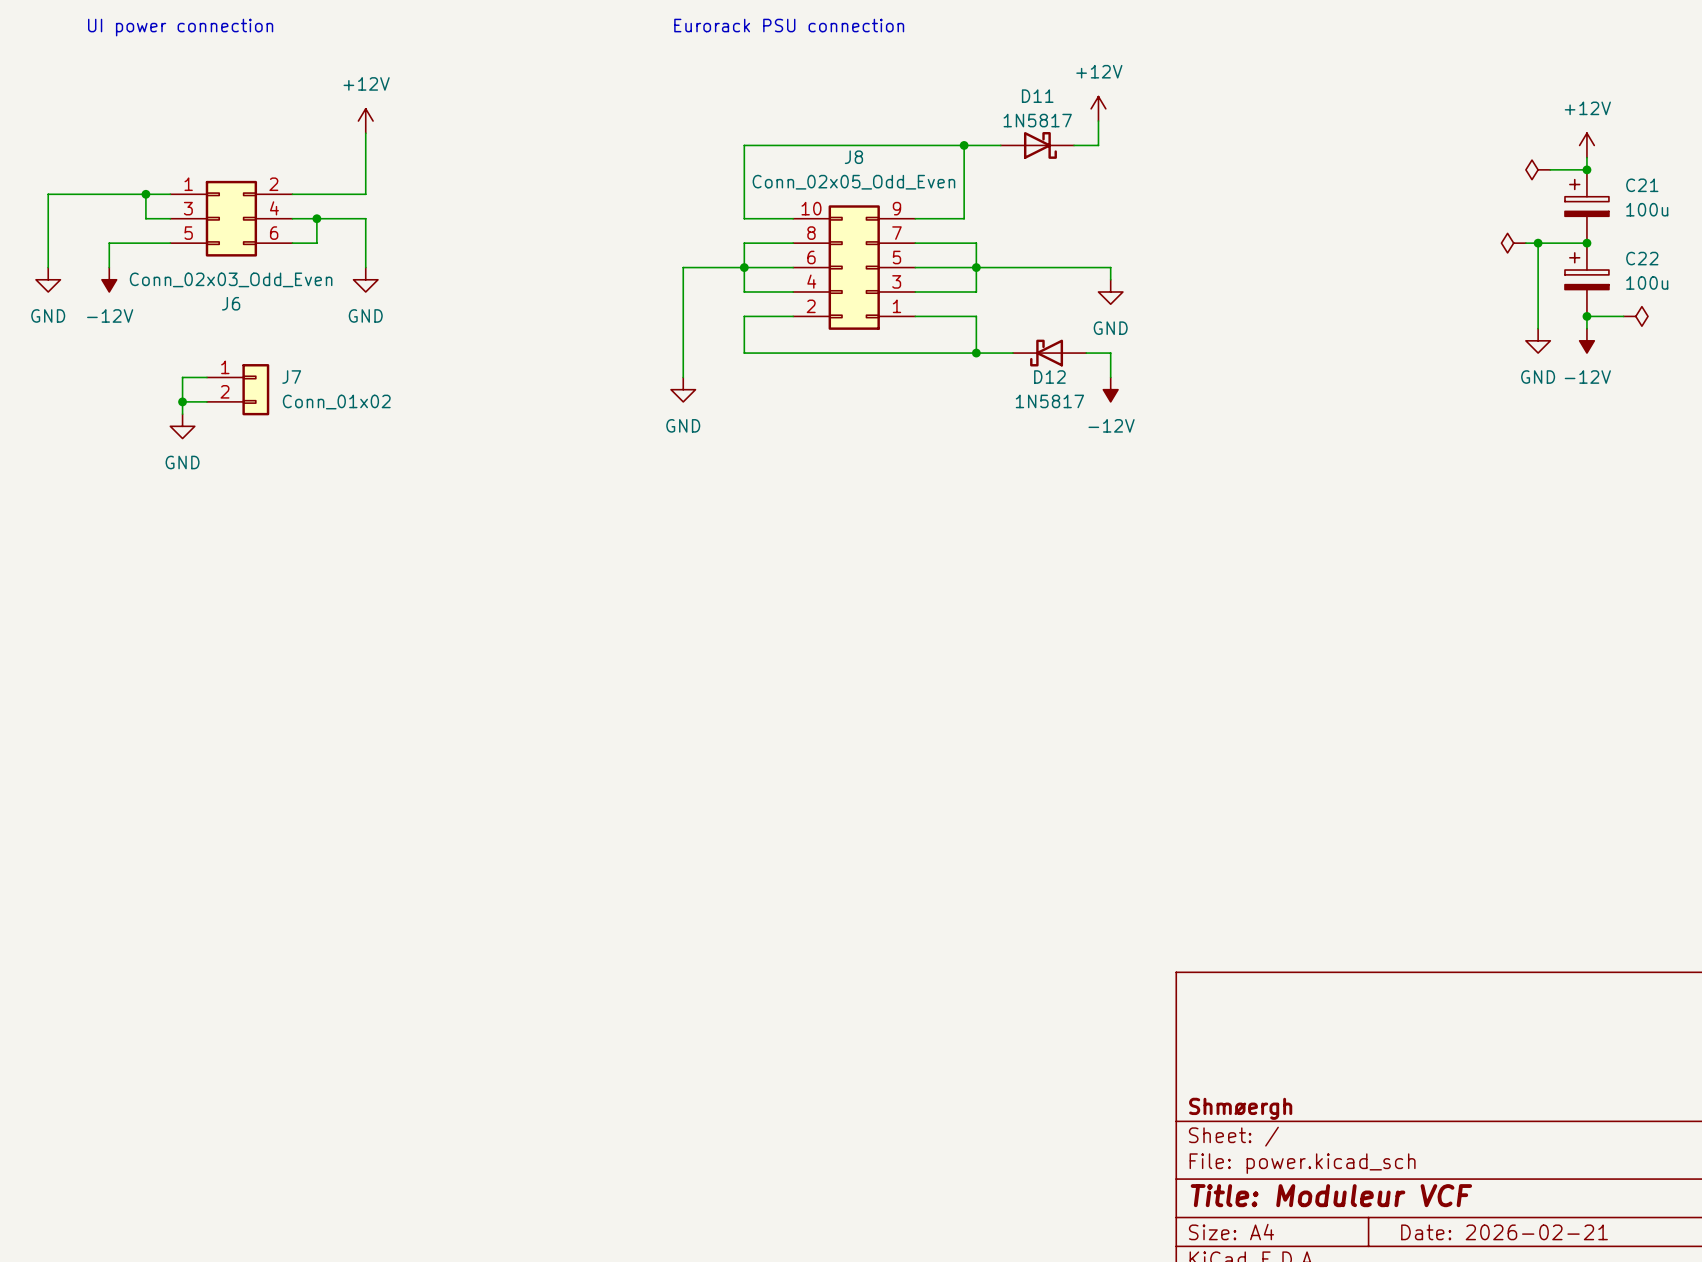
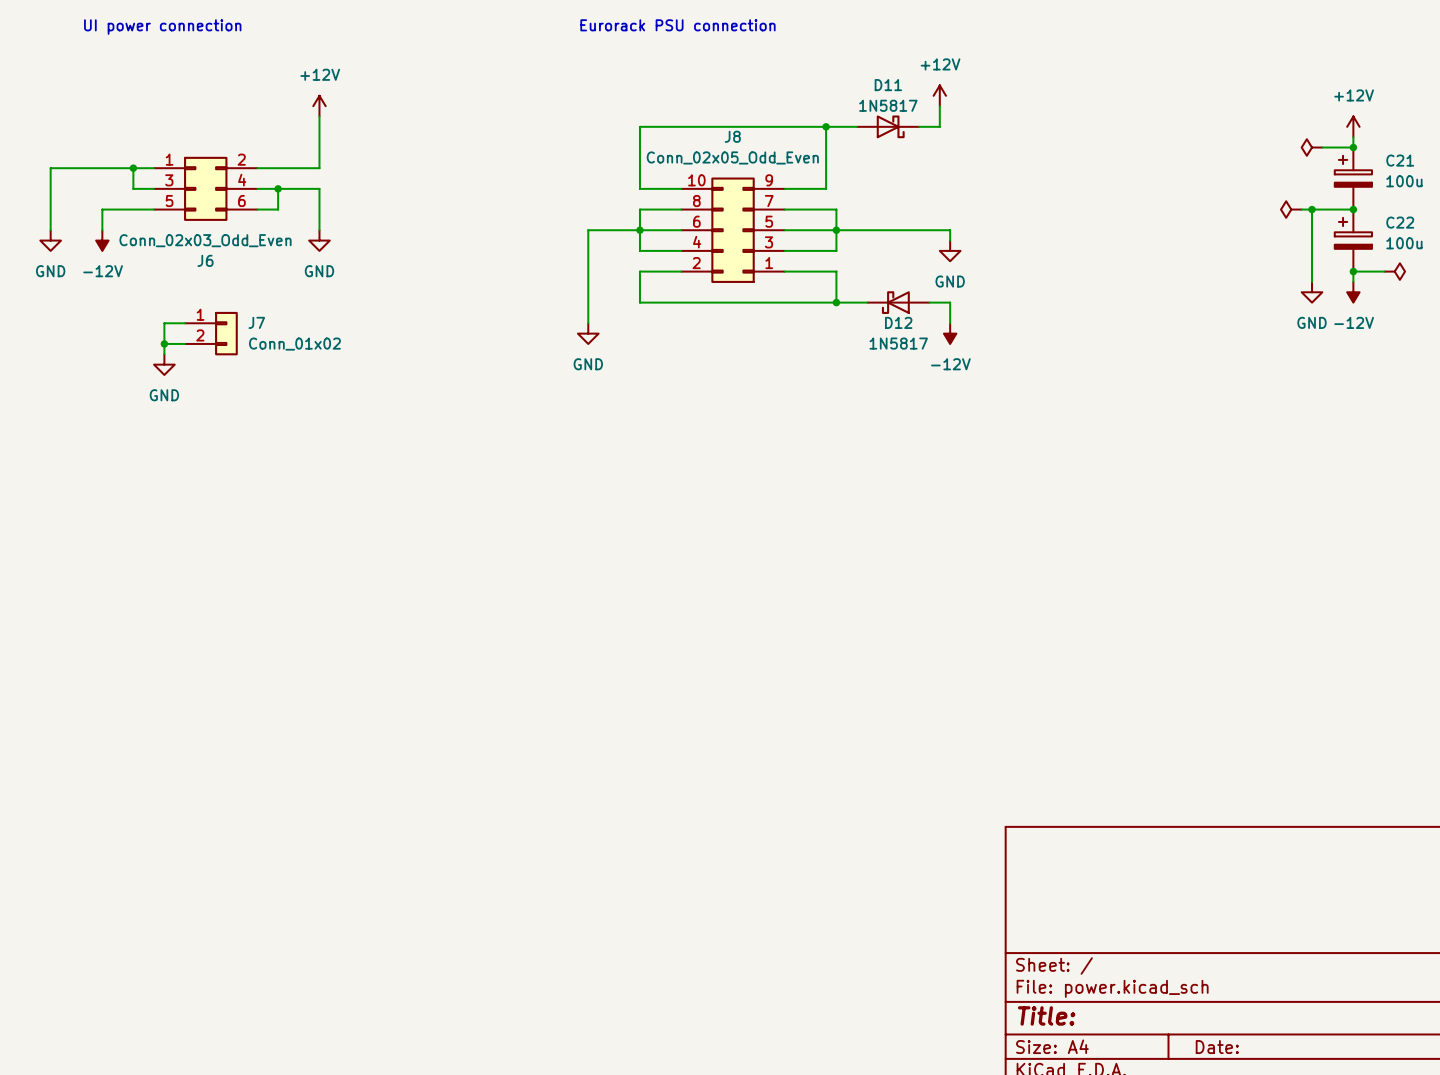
title block: Shmøergh (1240, 1108) -> none
title block: Title: Moduleur VCF (1331, 1195) -> Title: (1046, 1015)
title block: Date: 2026-02-21 (1504, 1232) -> Date: (1217, 1047)

